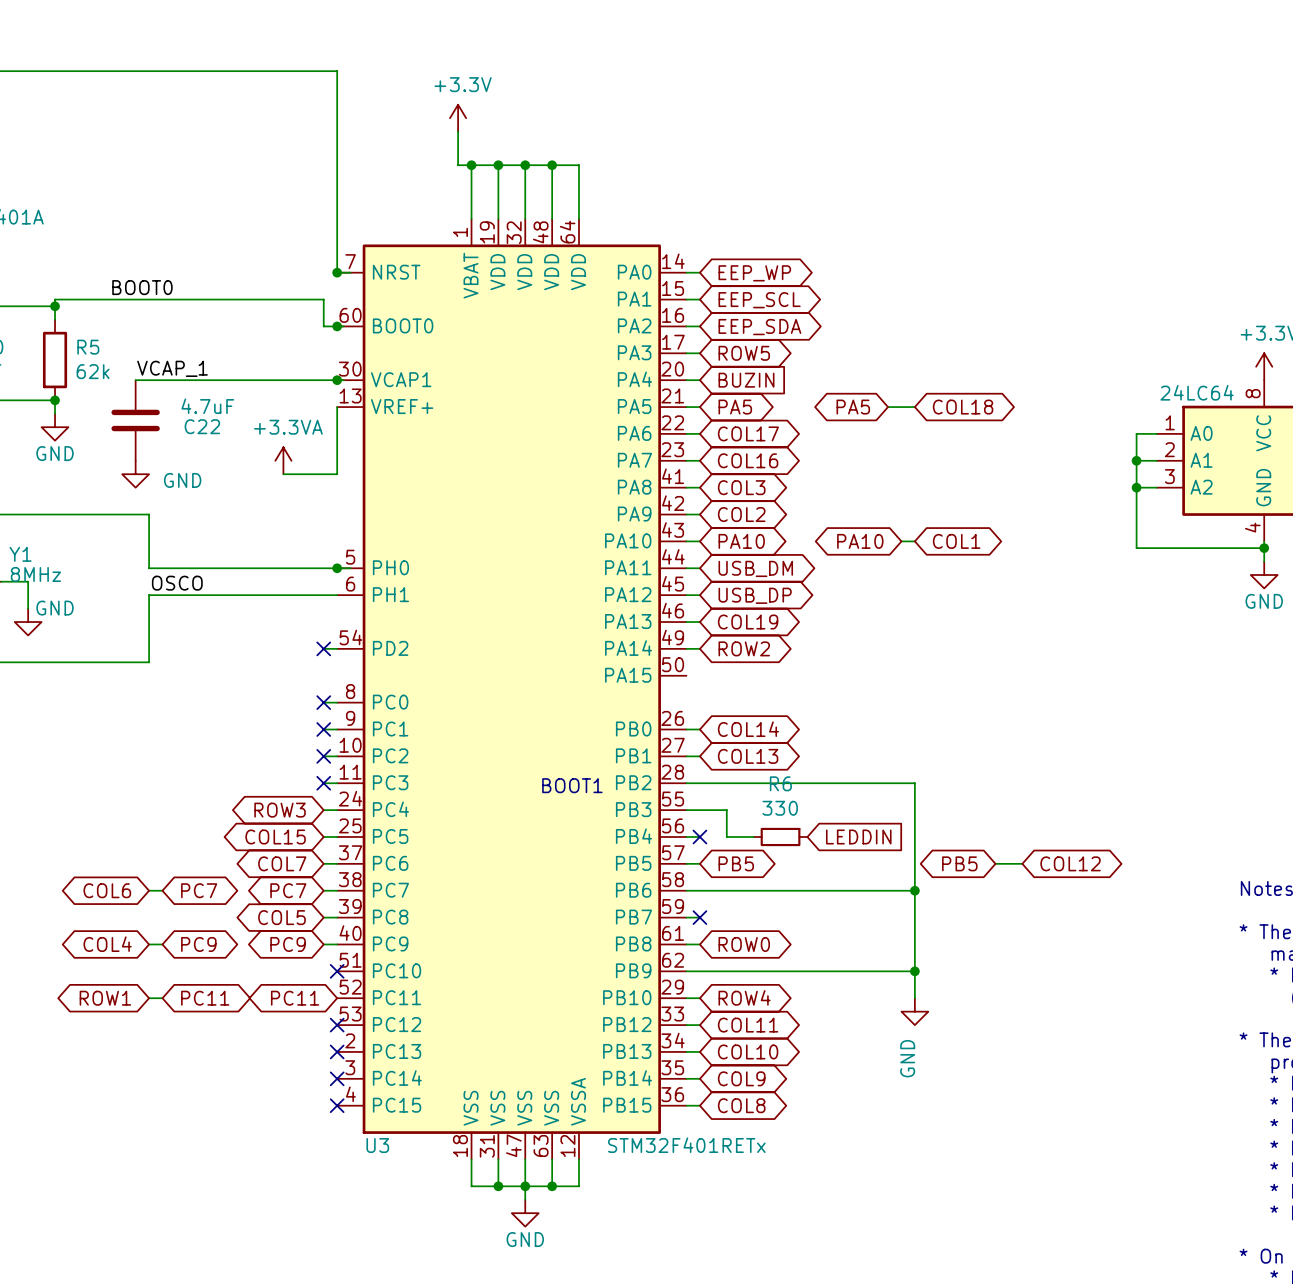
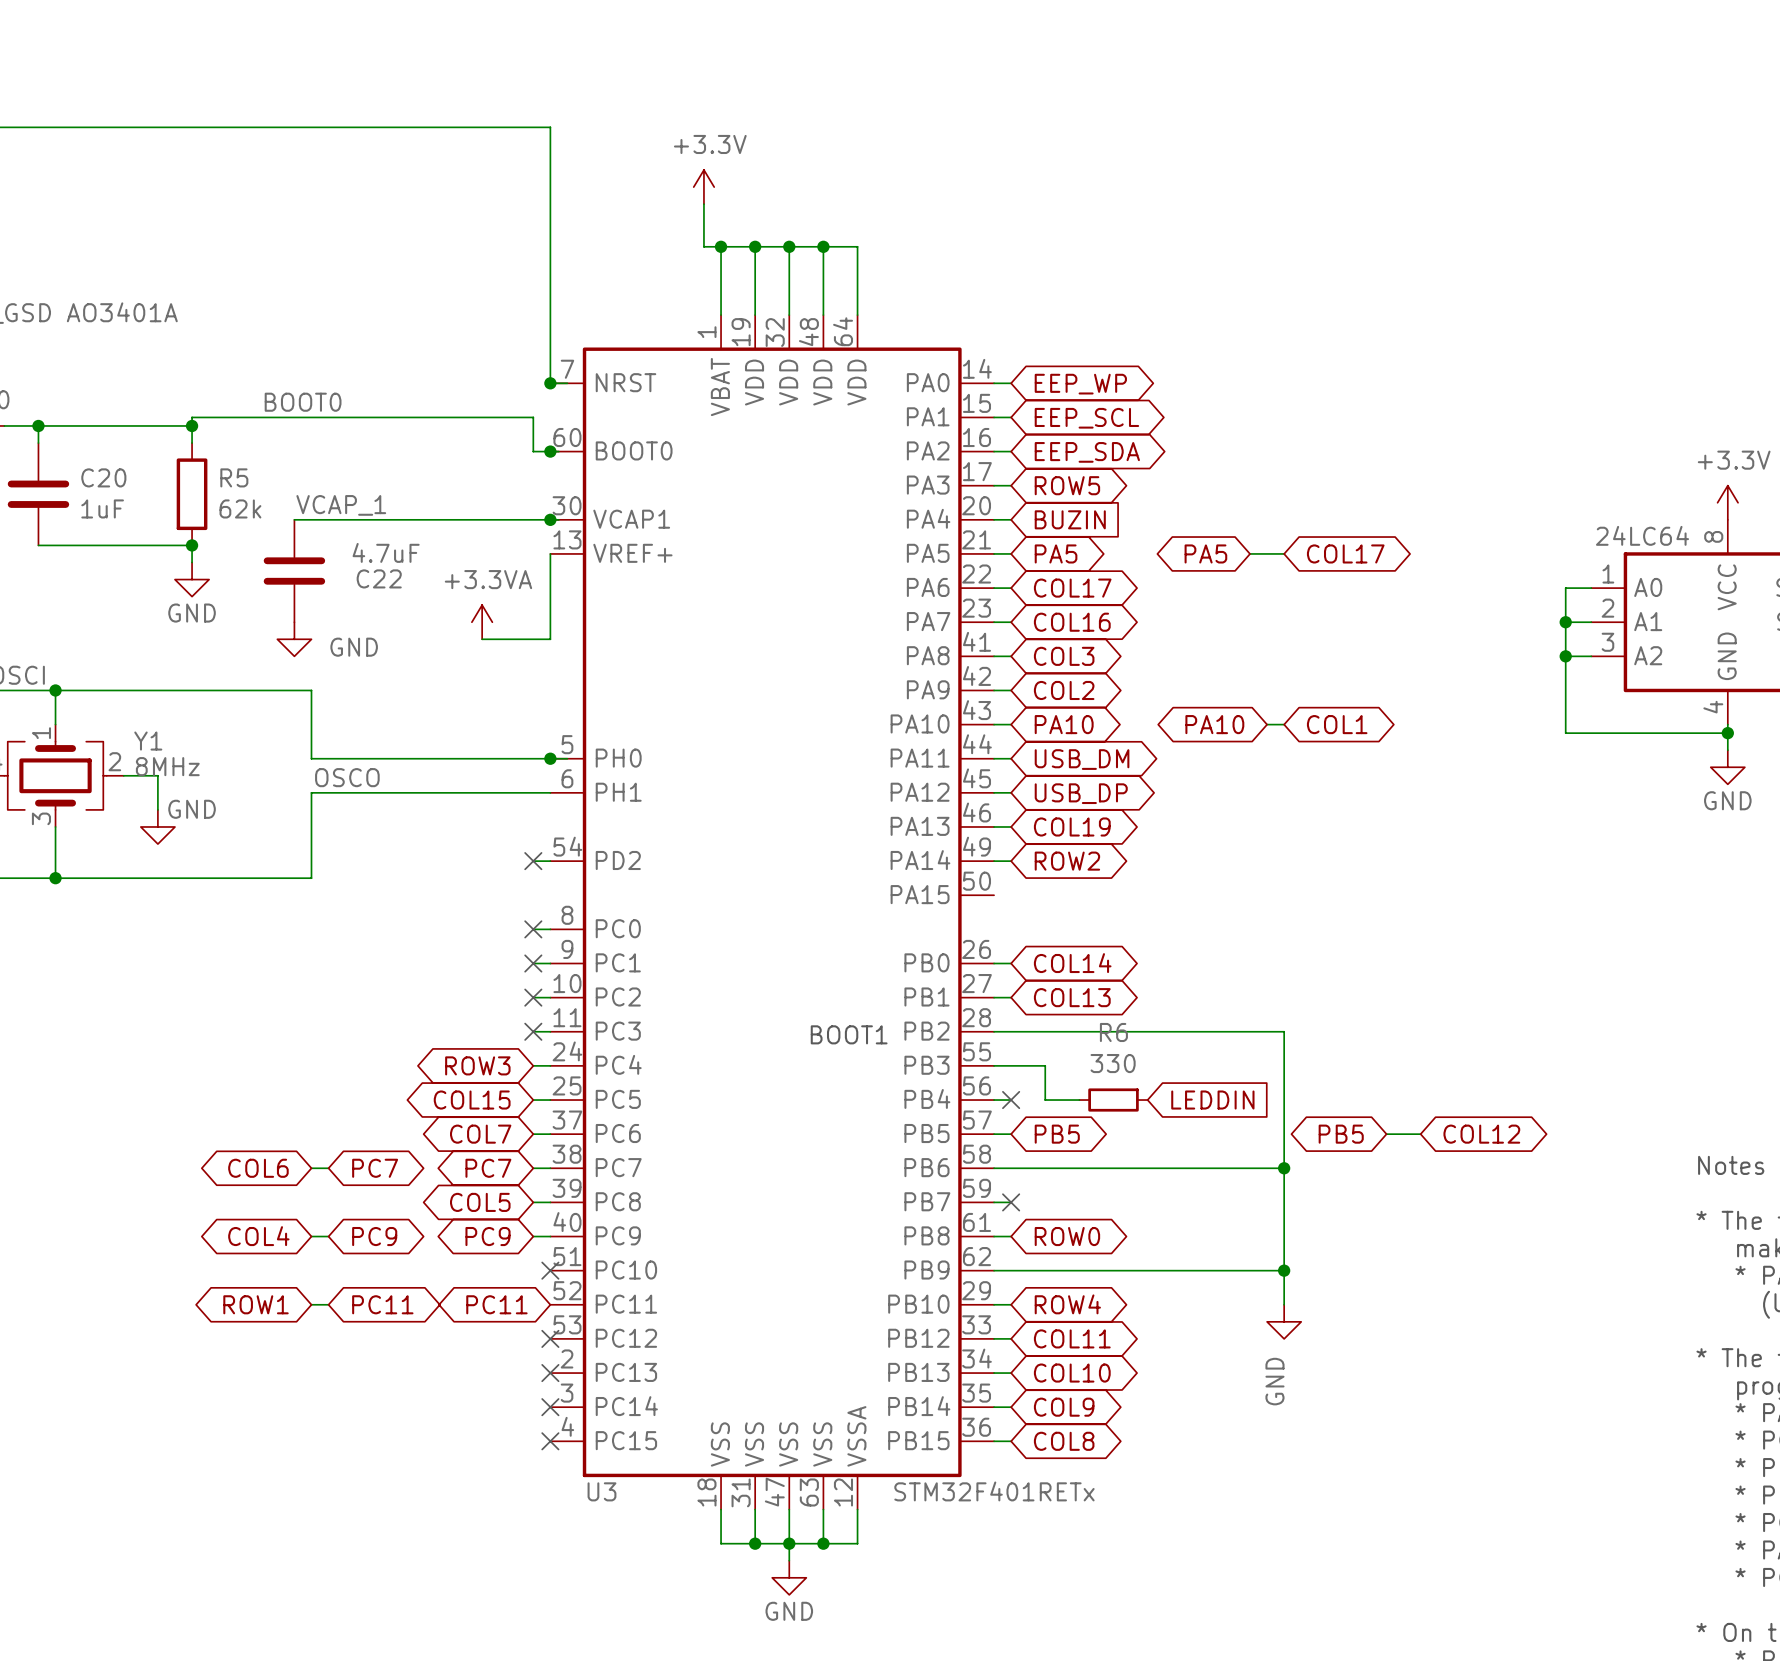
global label: COL18 (963, 407) -> COL17 (1345, 553)

